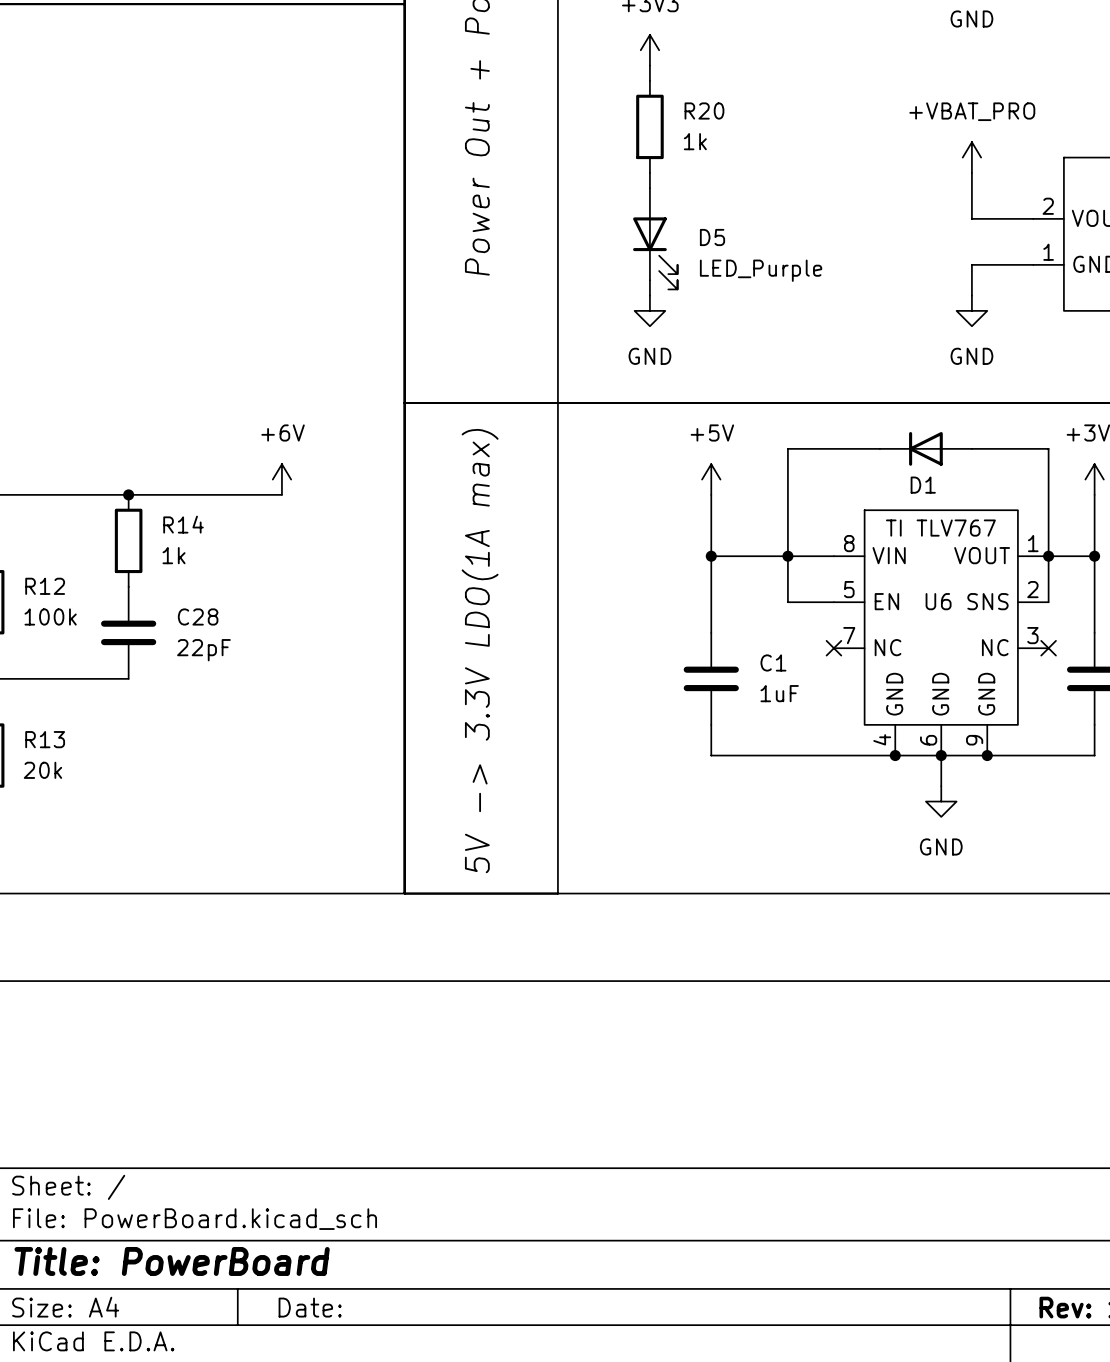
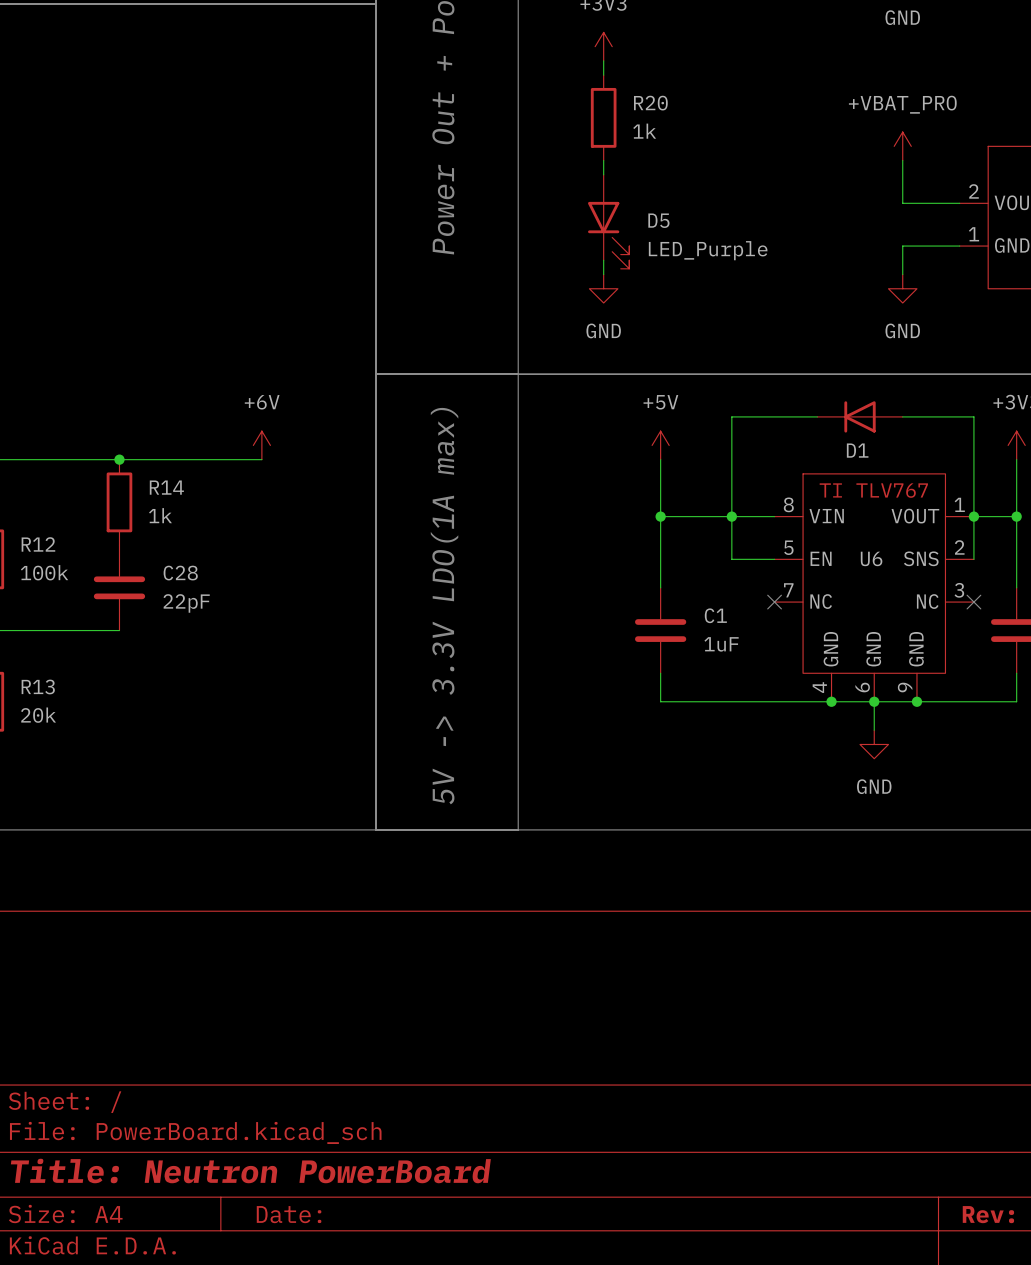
title block: Title: PowerBoard (172, 1261) -> Title: Neutron PowerBoard (250, 1170)

